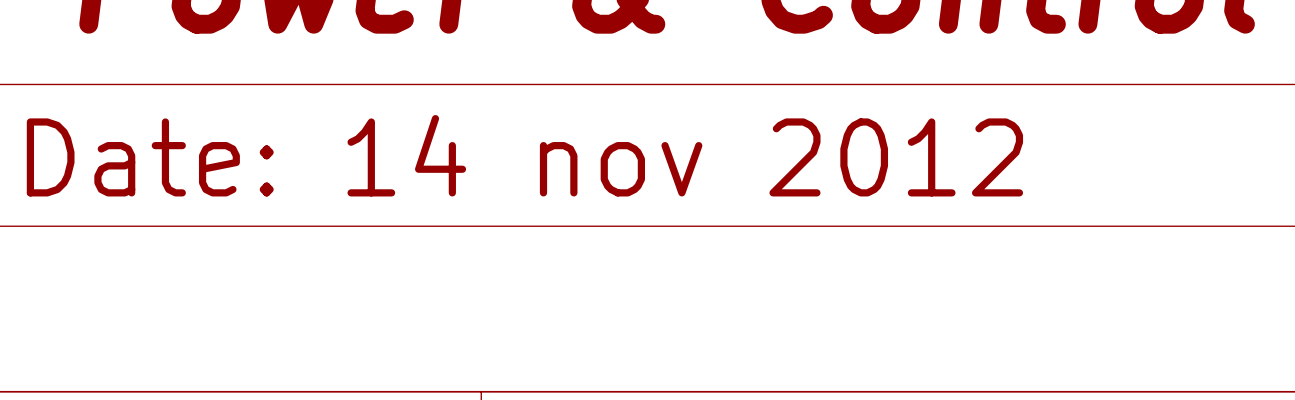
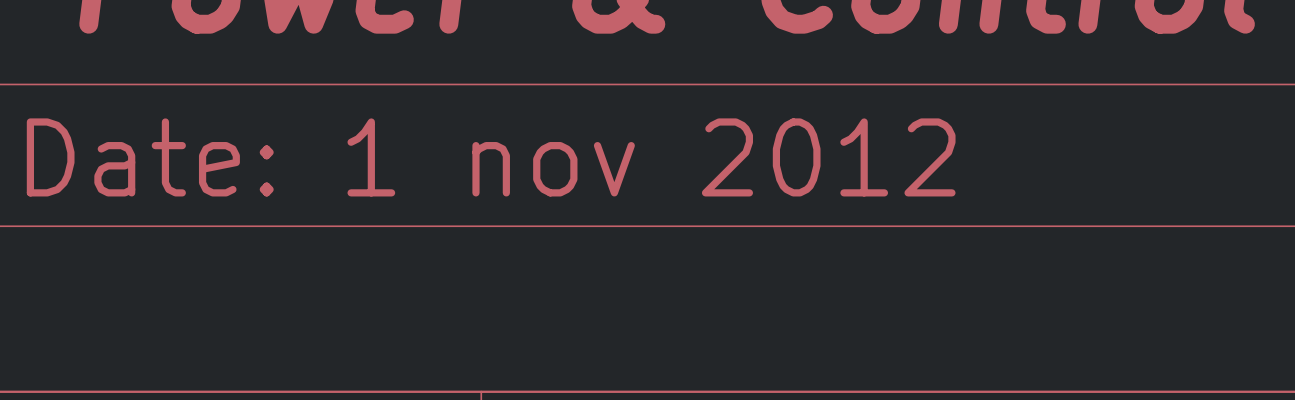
title block: Date: 14 nov 2012 (524, 155) -> Date: 1 nov 2012 (491, 157)

